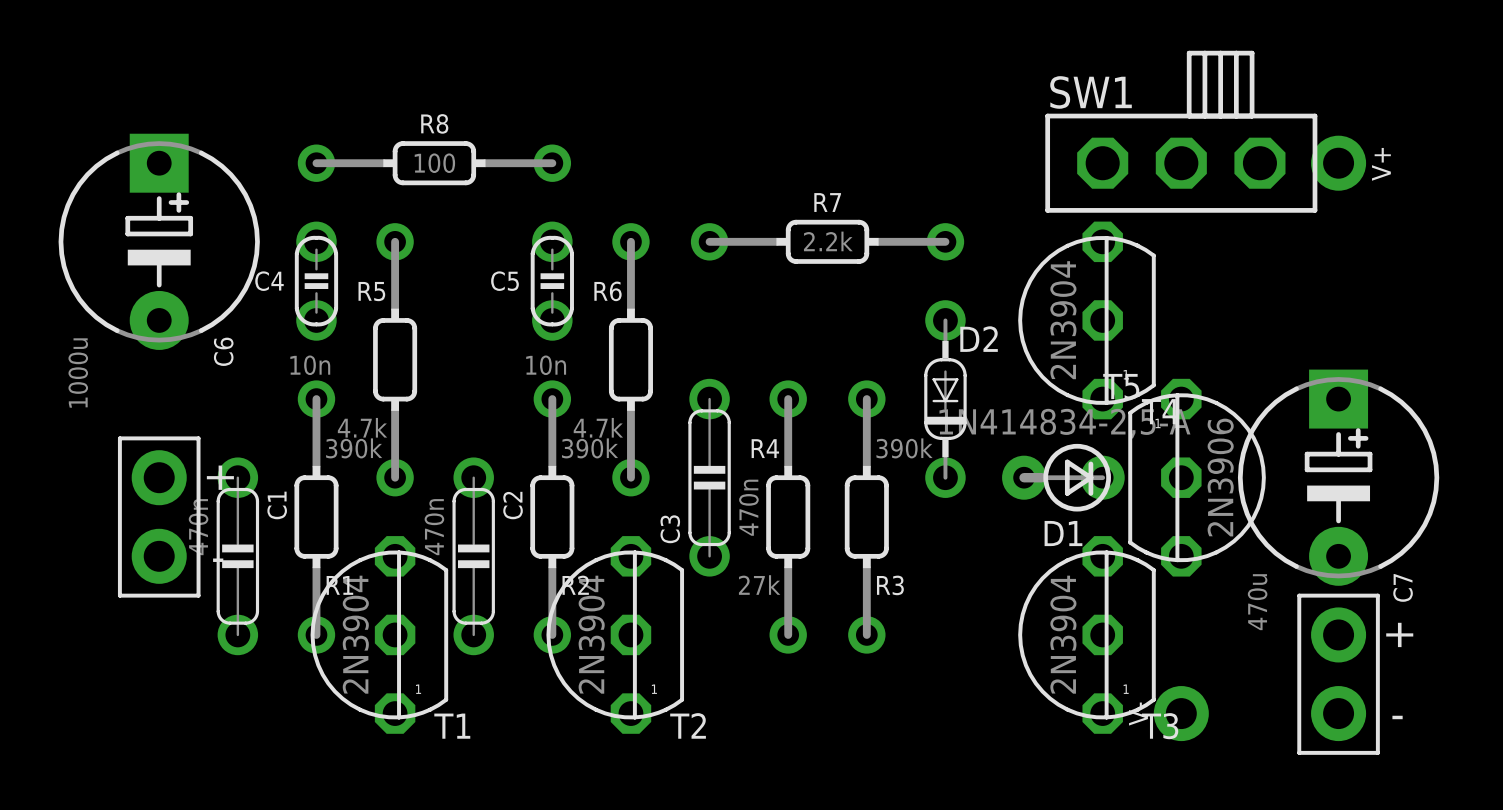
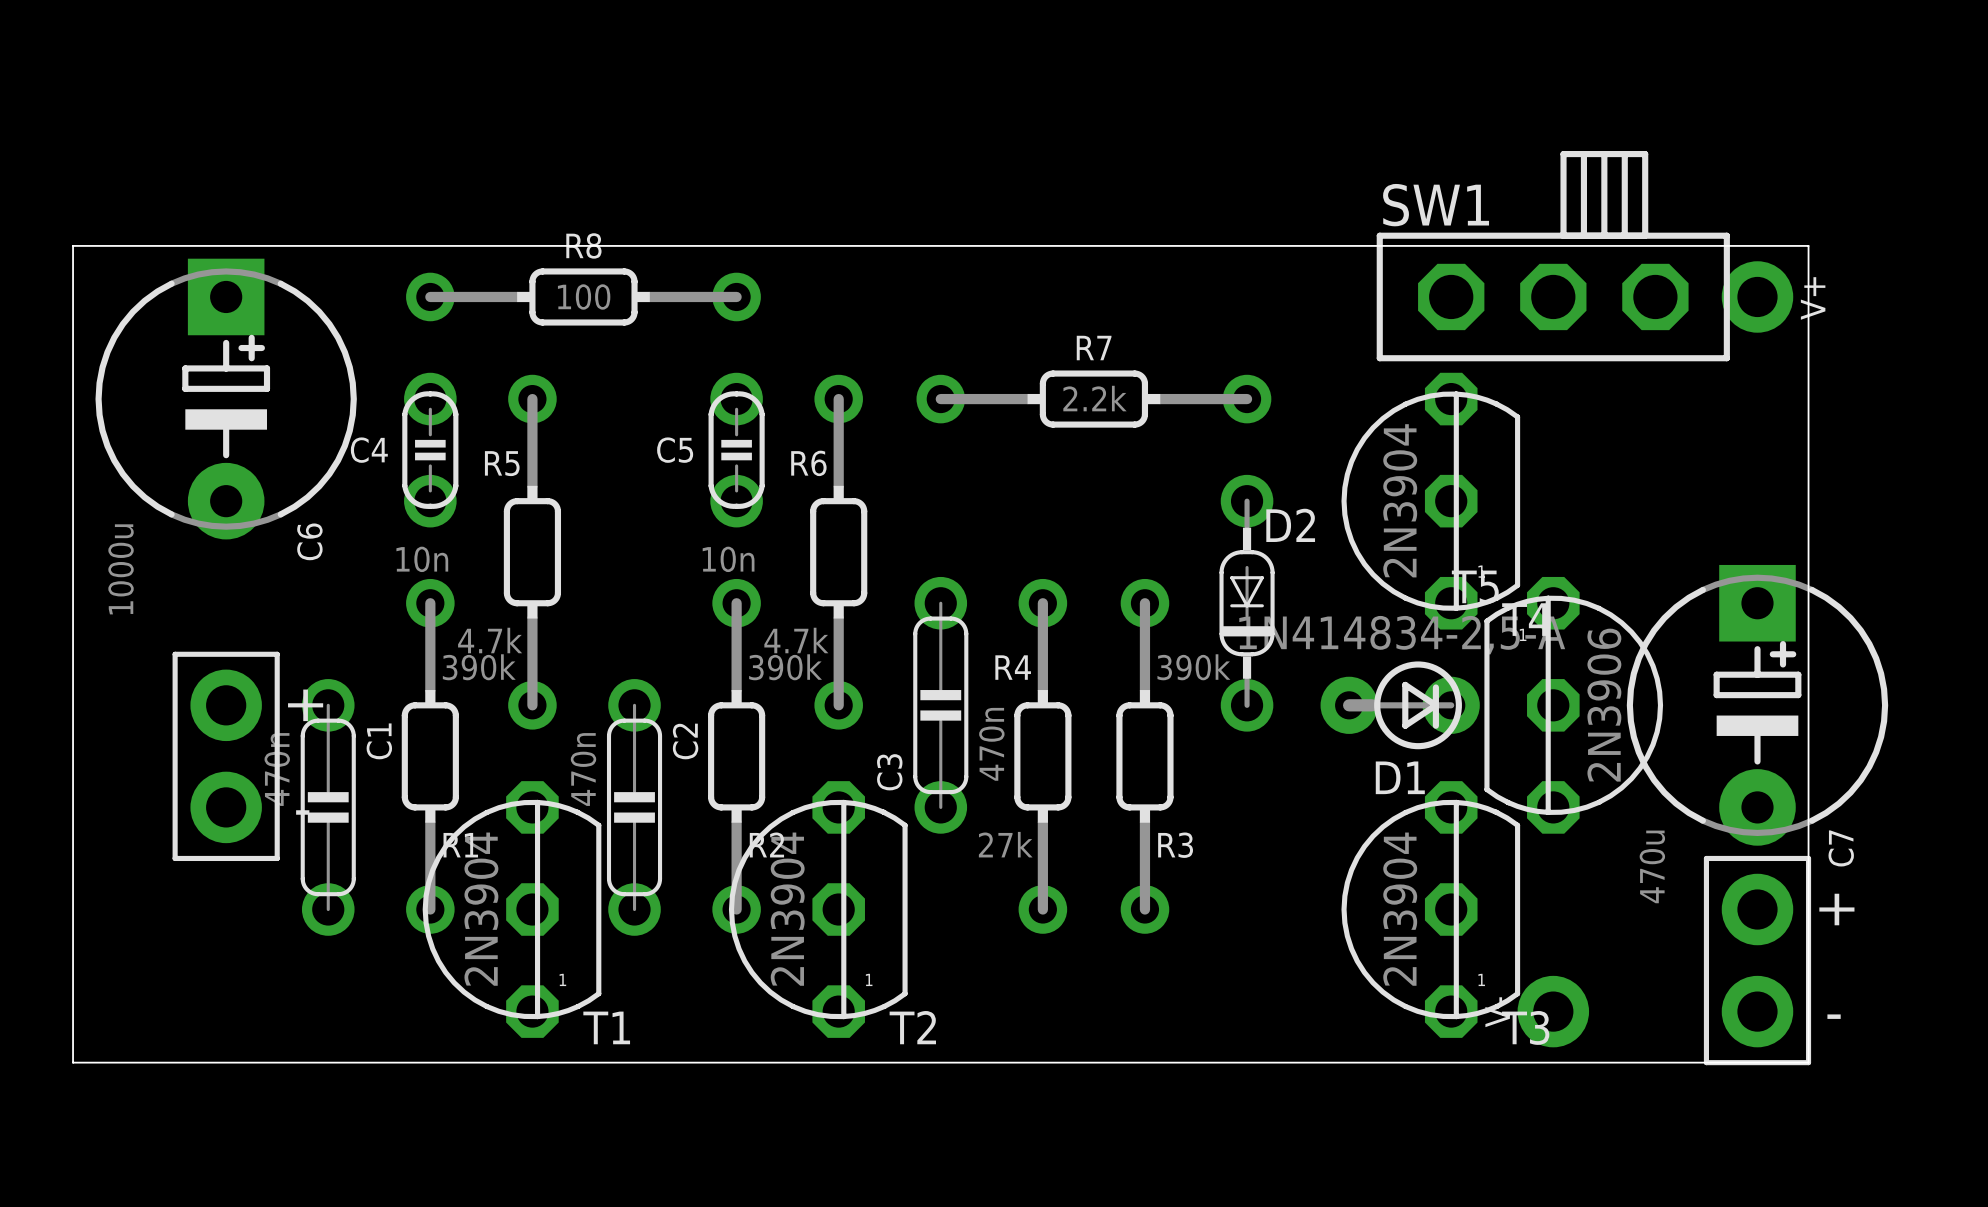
board edge: none -> (73, 245) (1808, 245) (1808, 1062) (73, 1062) (73, 245)

